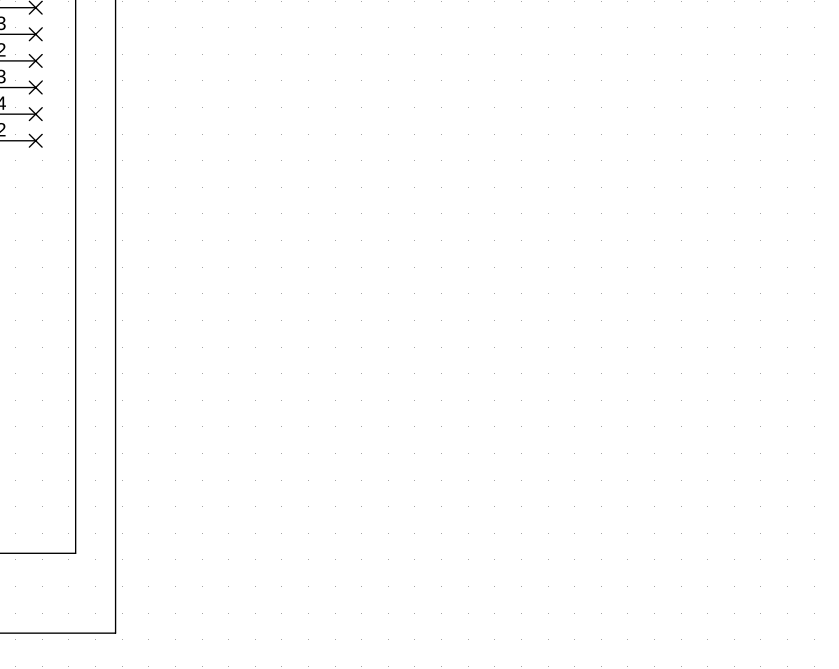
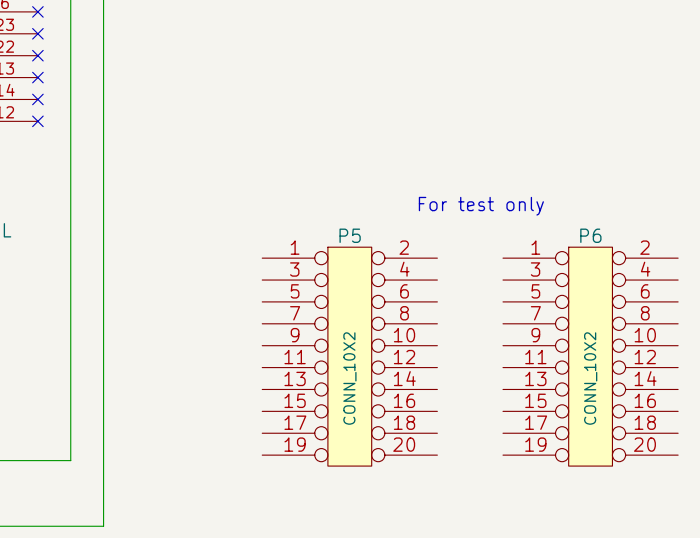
text: none -> For test only (481, 206)
P5: none -> CONN_10X2 (349, 356)
P6: none -> CONN_10X2 (590, 356)

